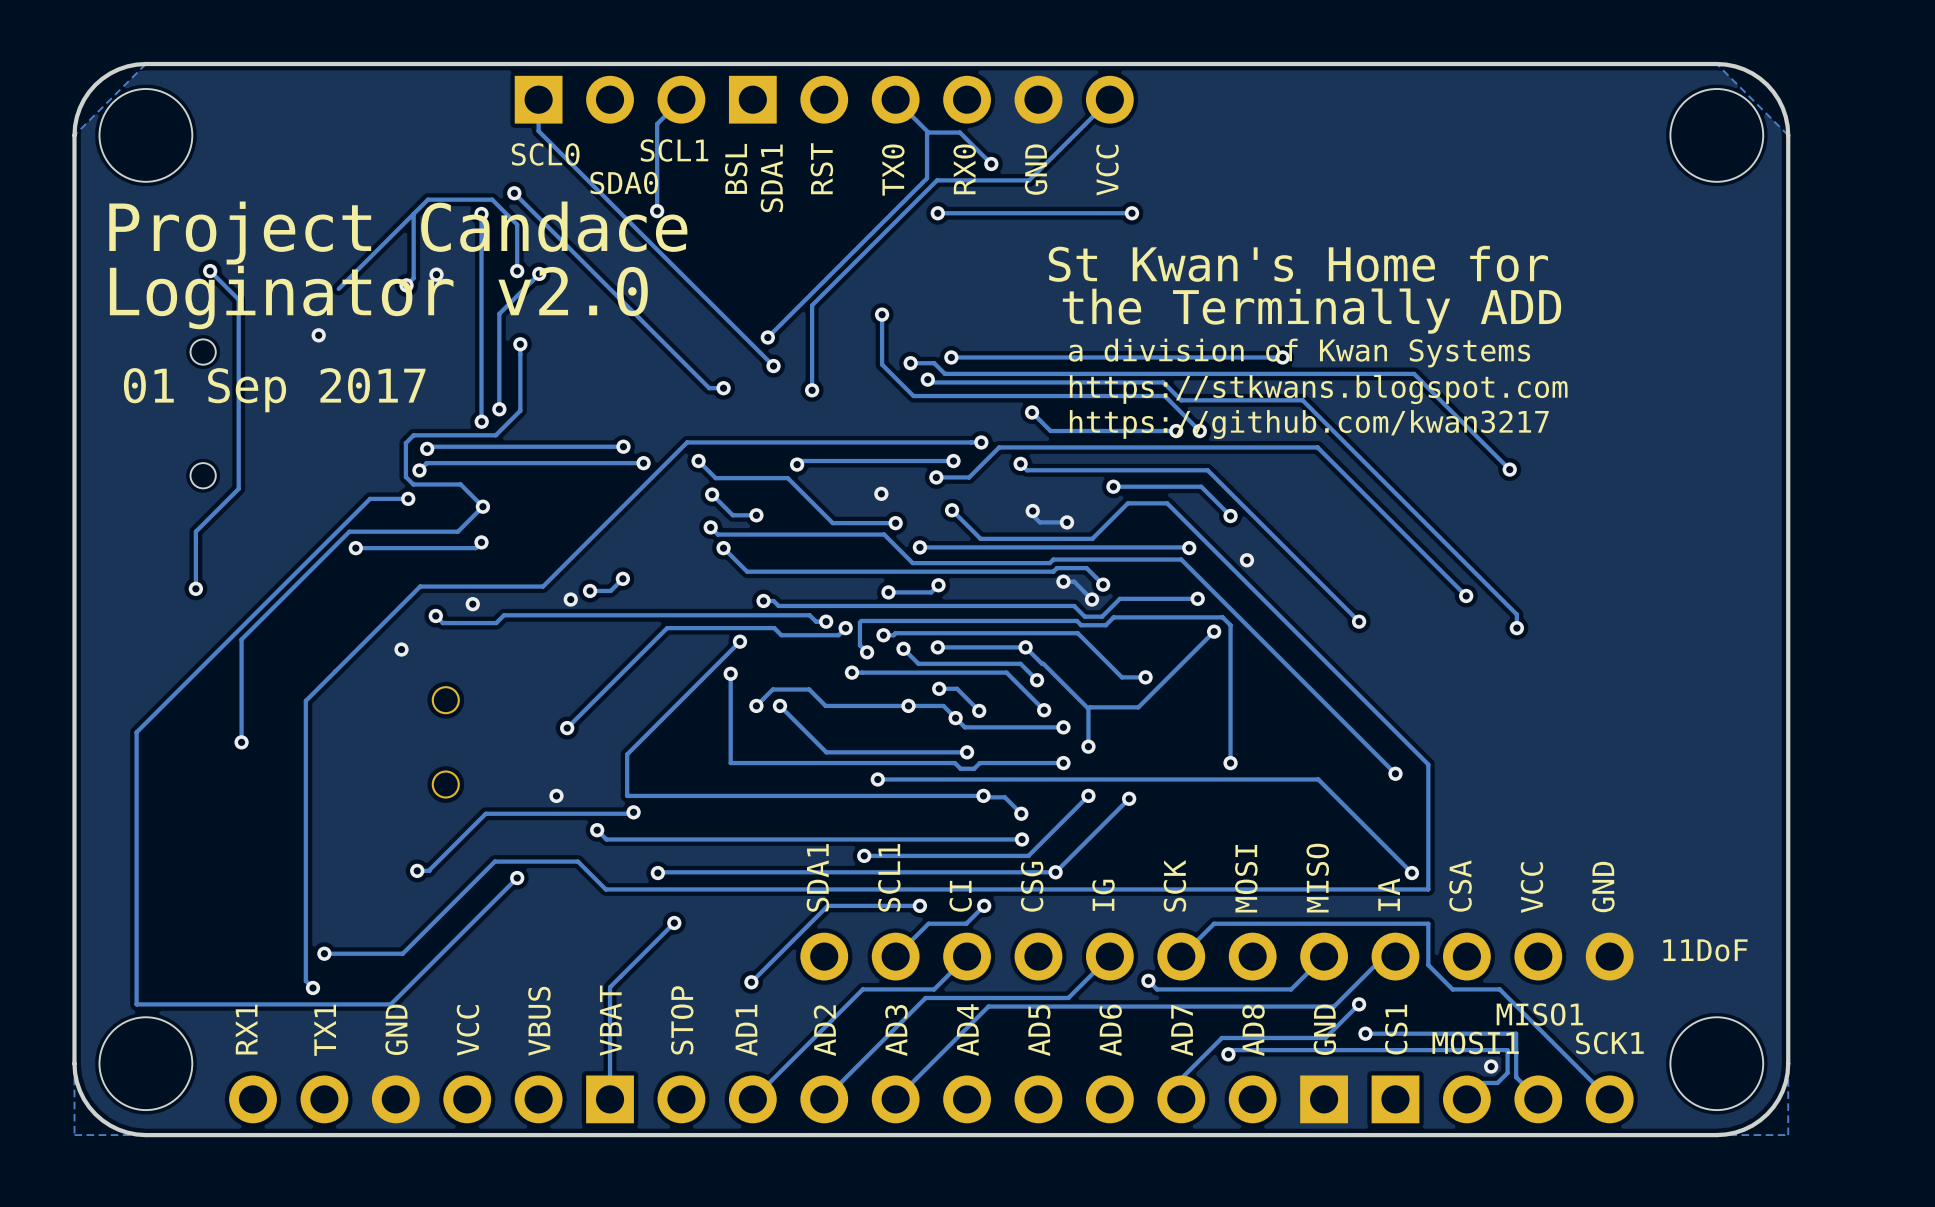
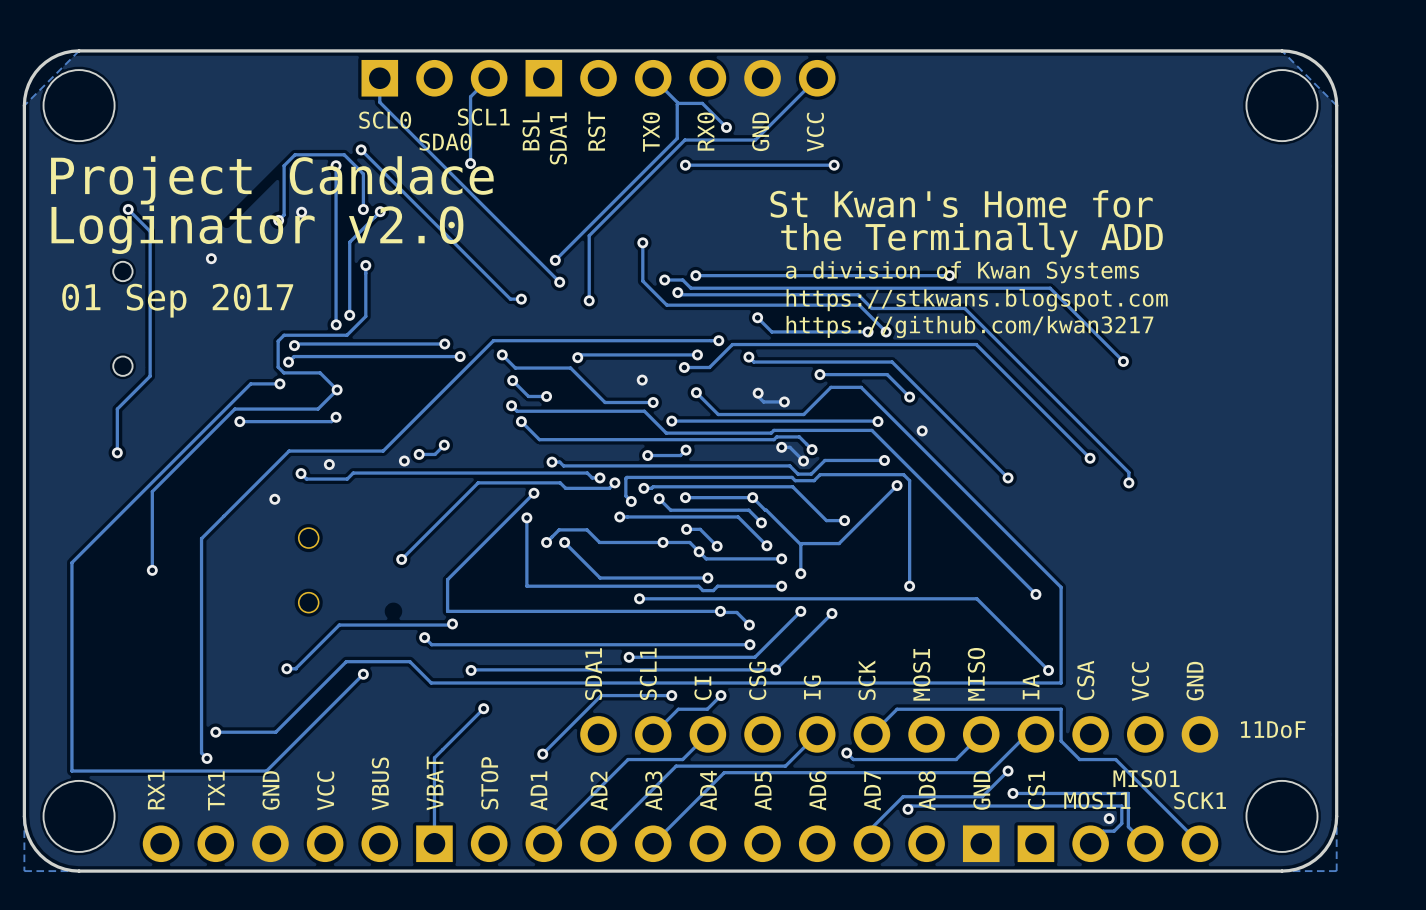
track: (413, 213) (338, 288) -> none
via: (556, 795) -> none

